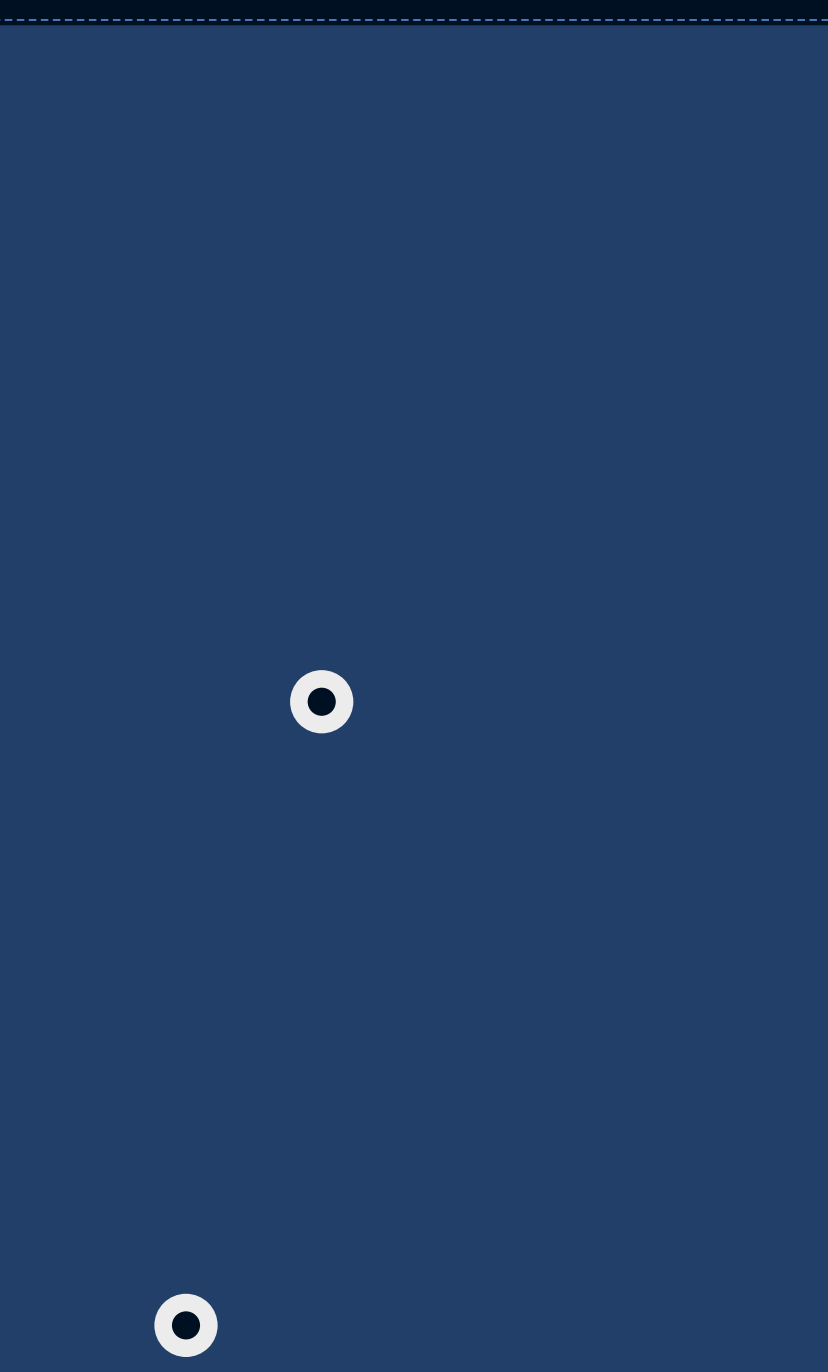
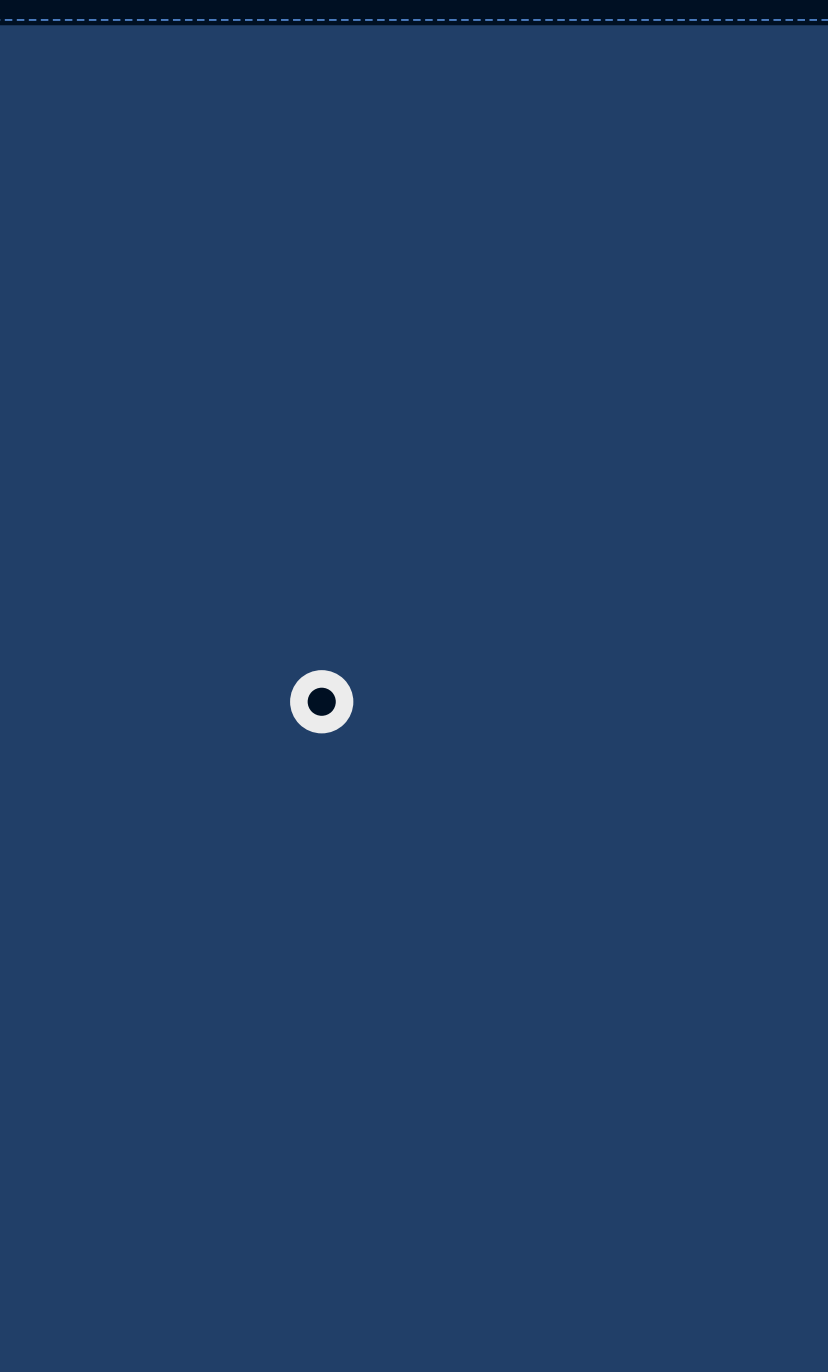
via: (186, 1325) -> none

